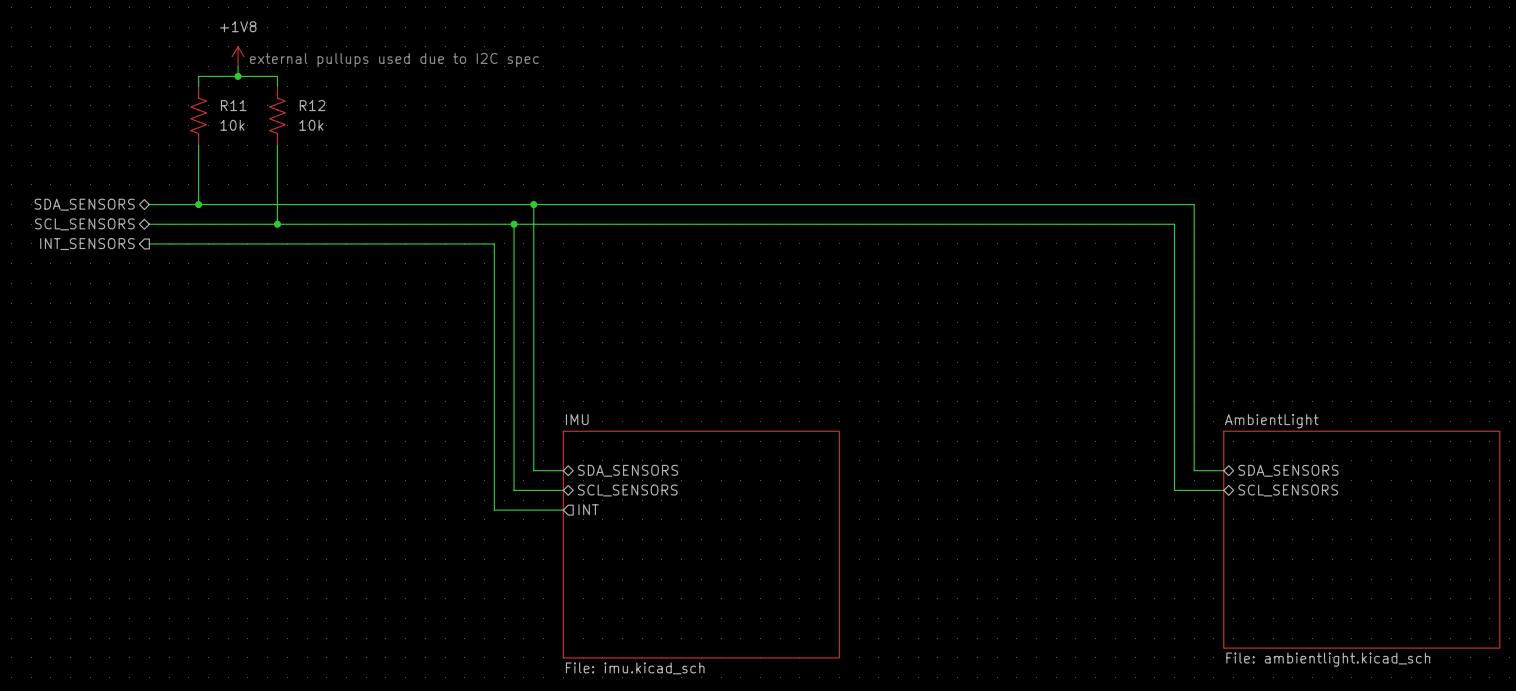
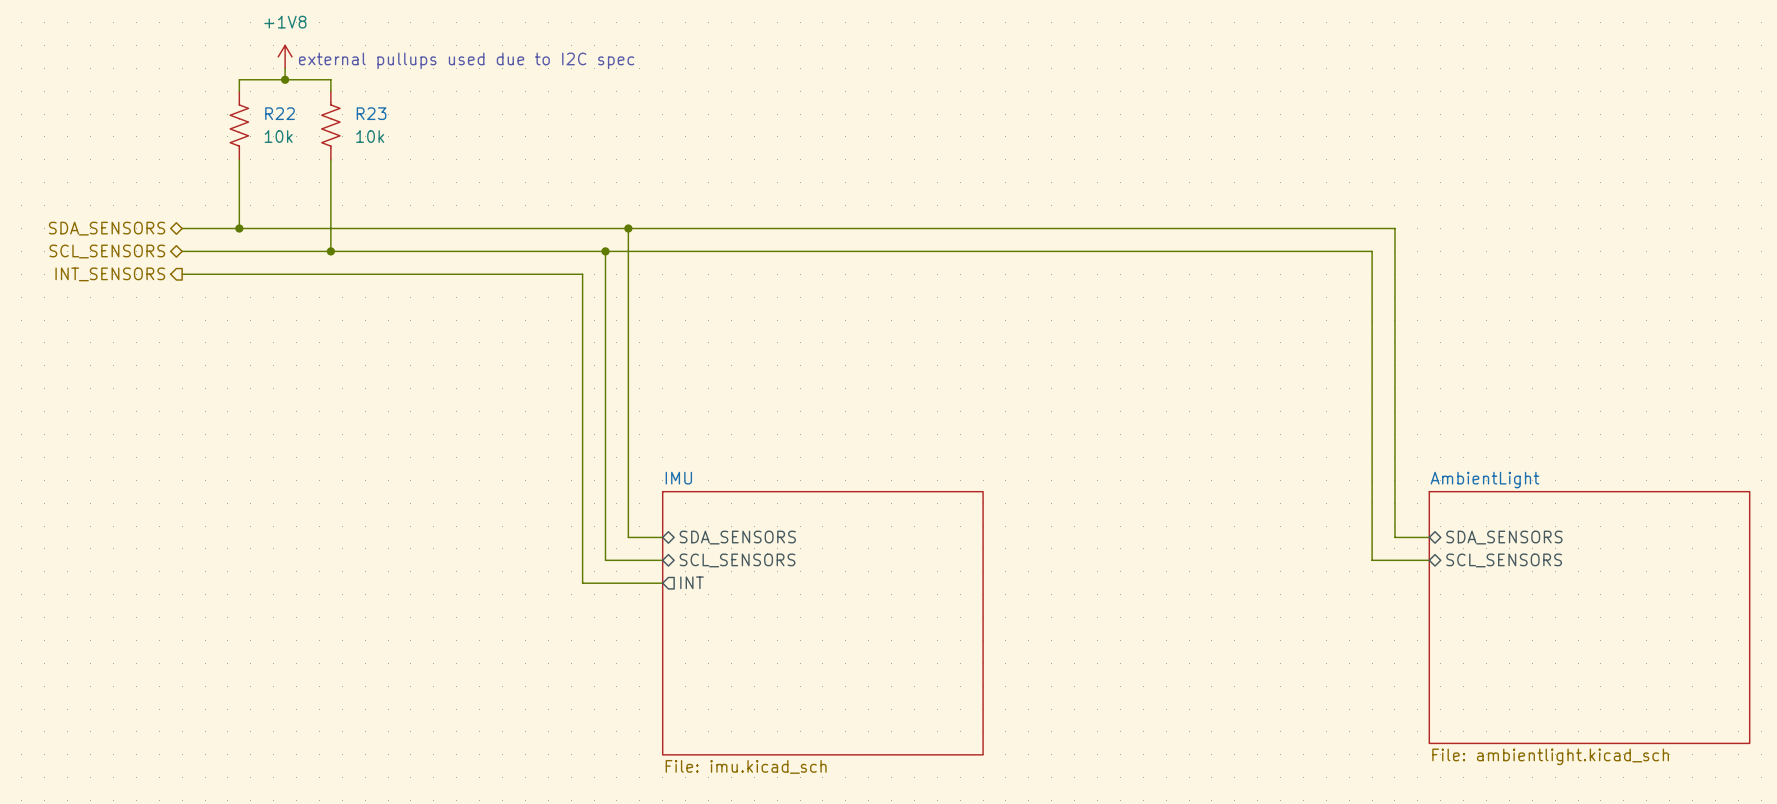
R11 name: R11 (233, 105) -> R22 (280, 113)
R12 name: R12 (312, 105) -> R23 (371, 113)

